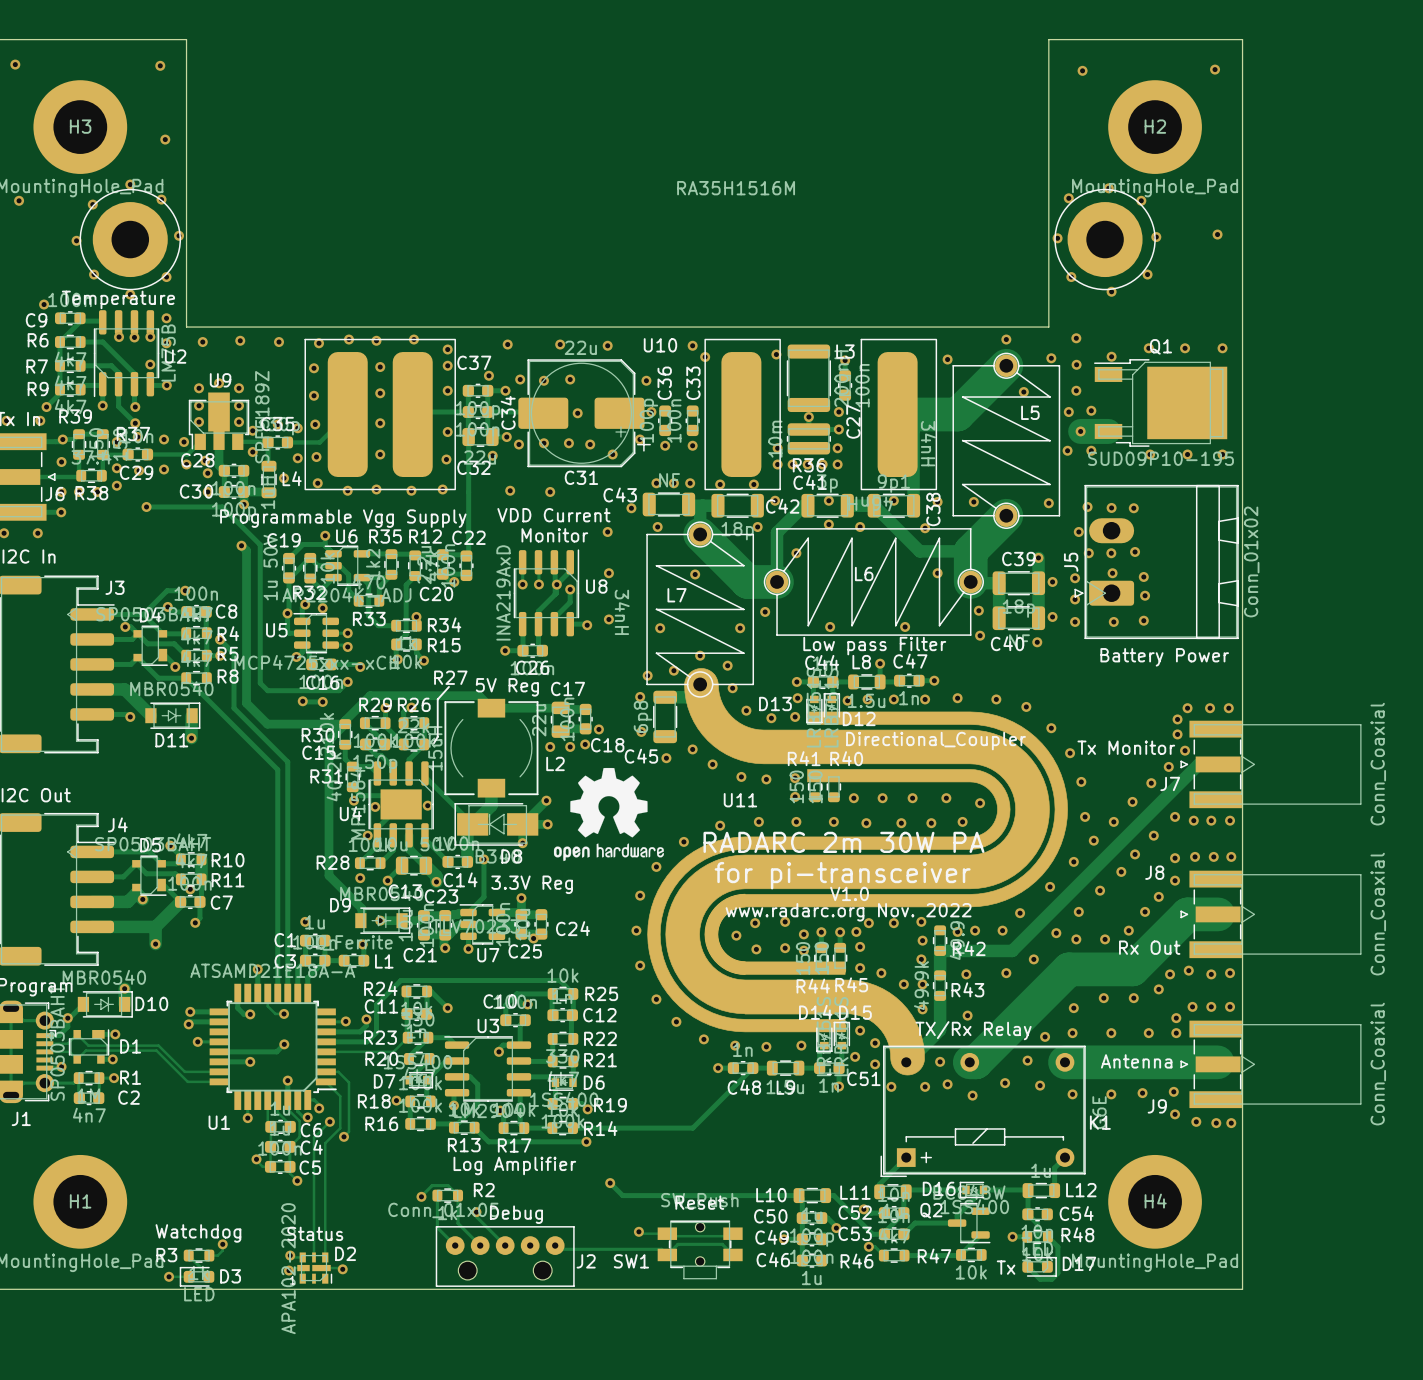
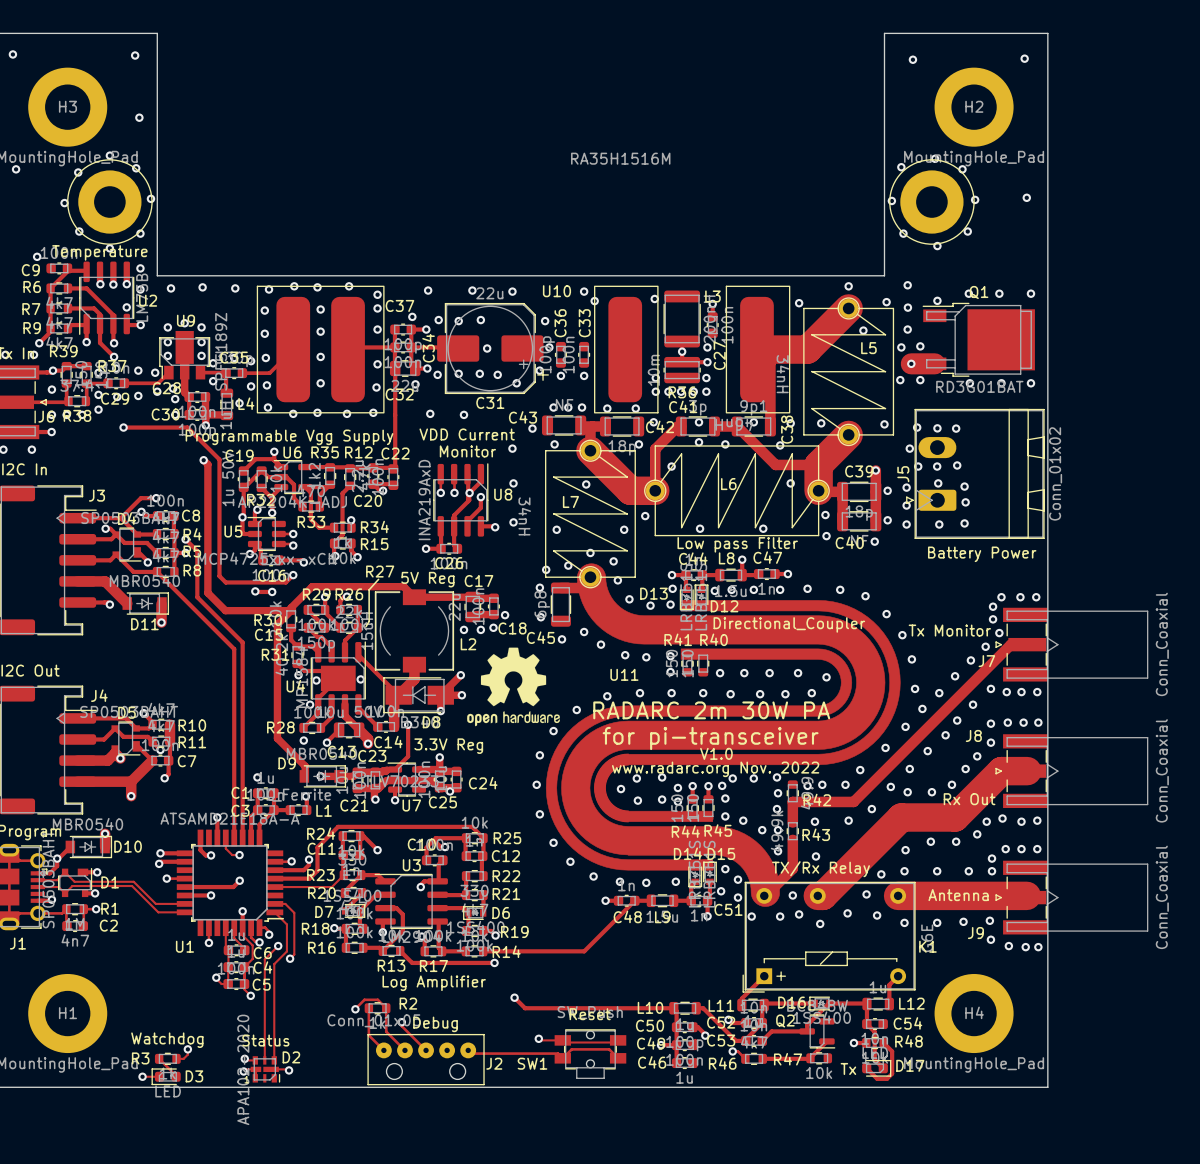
Q1 value: SUD09P10-195 (1160, 458) -> RD3G01BAT (979, 386)

